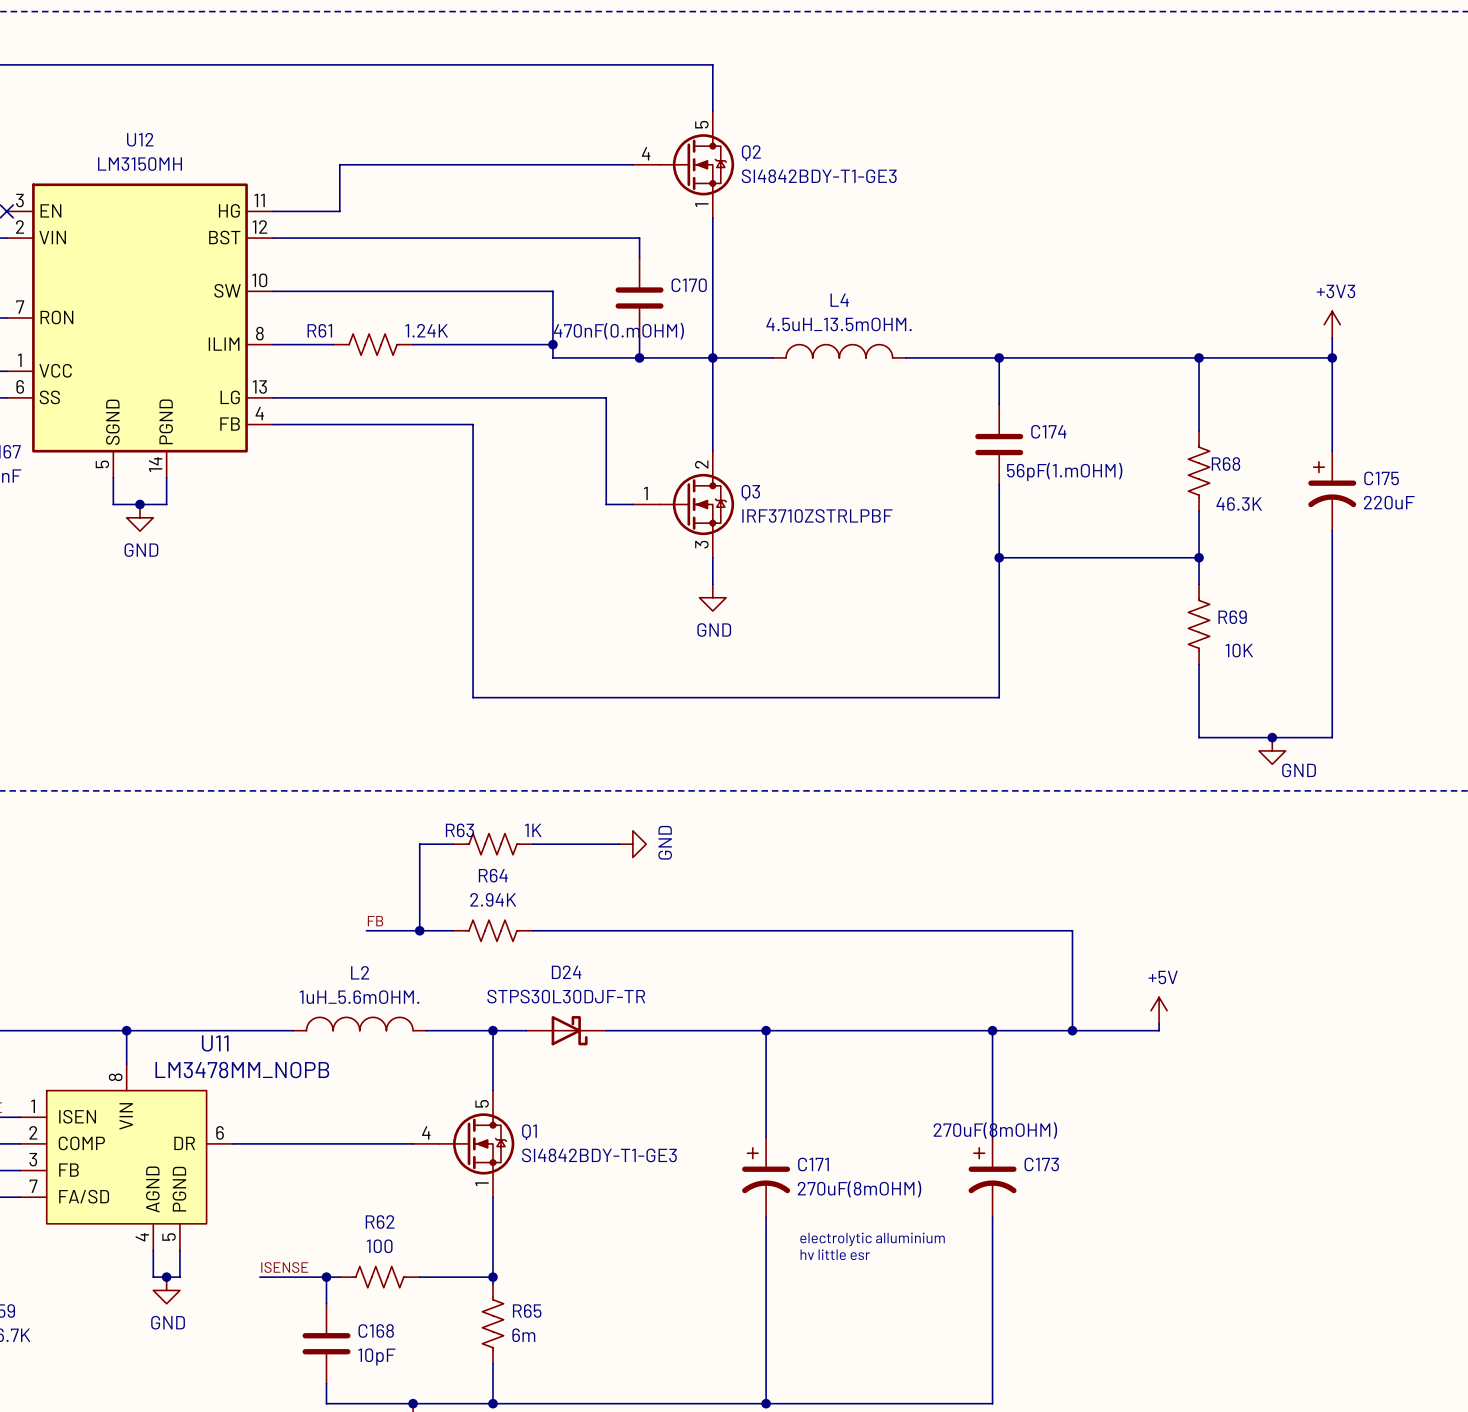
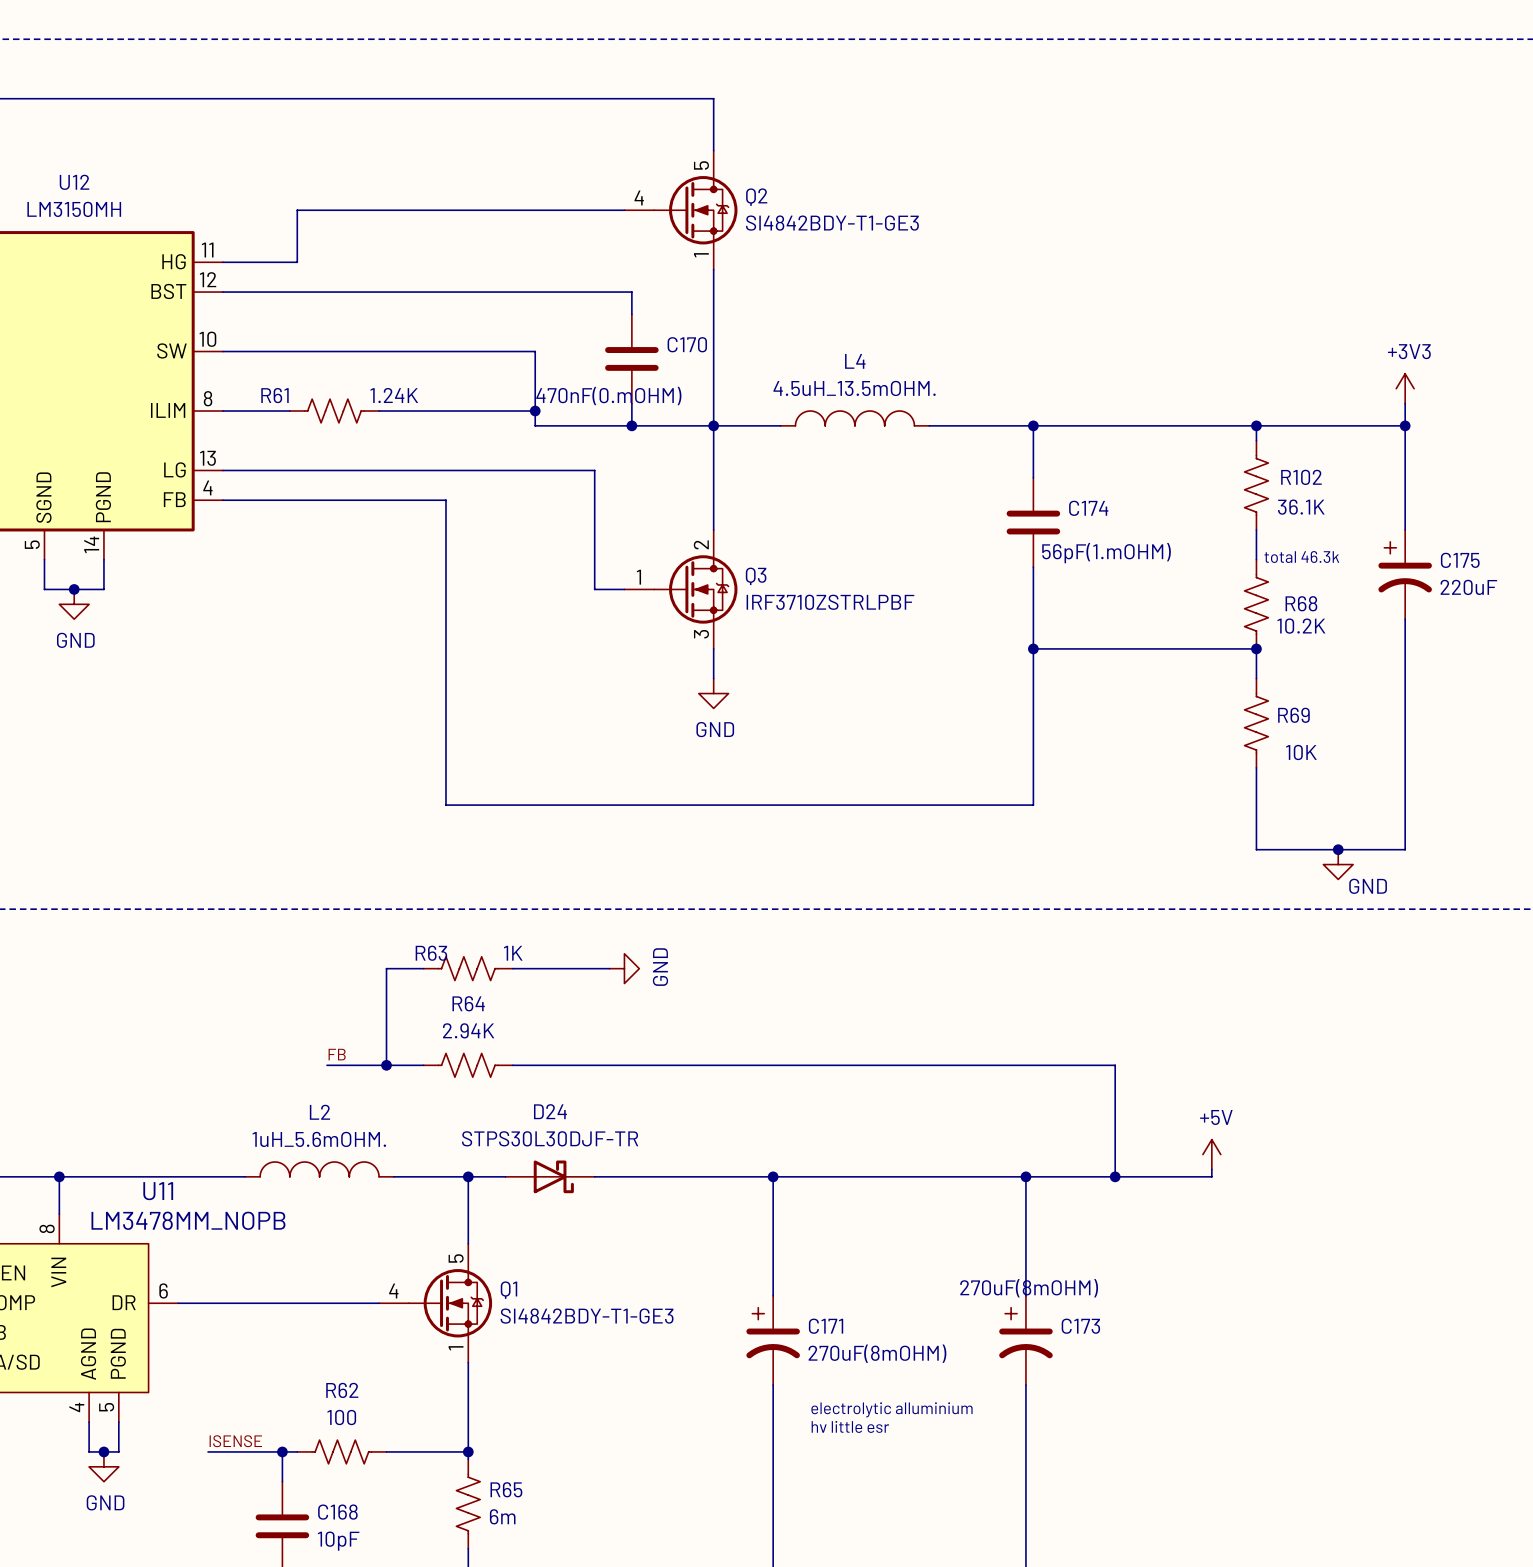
wire: (1199, 371) (1199, 431) -> none
R102: none -> 36.1K (1256, 485)
wire: none -> (1256, 529) (1256, 559)
R68 name position: R68 (1225, 464) -> R68 (1301, 603)
R68 position: (1199, 471) -> (1256, 604)
text: none -> total 46.3k (1301, 557)
R68 value: 46.3K (1239, 503) -> 10.2K (1301, 626)
wire: (1199, 511) (1199, 557) -> none

